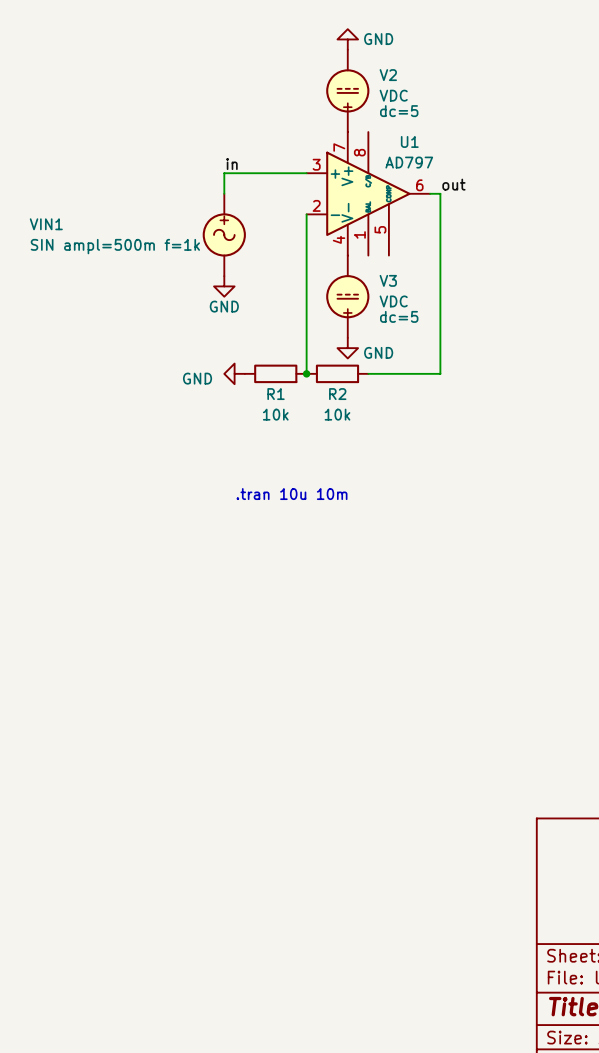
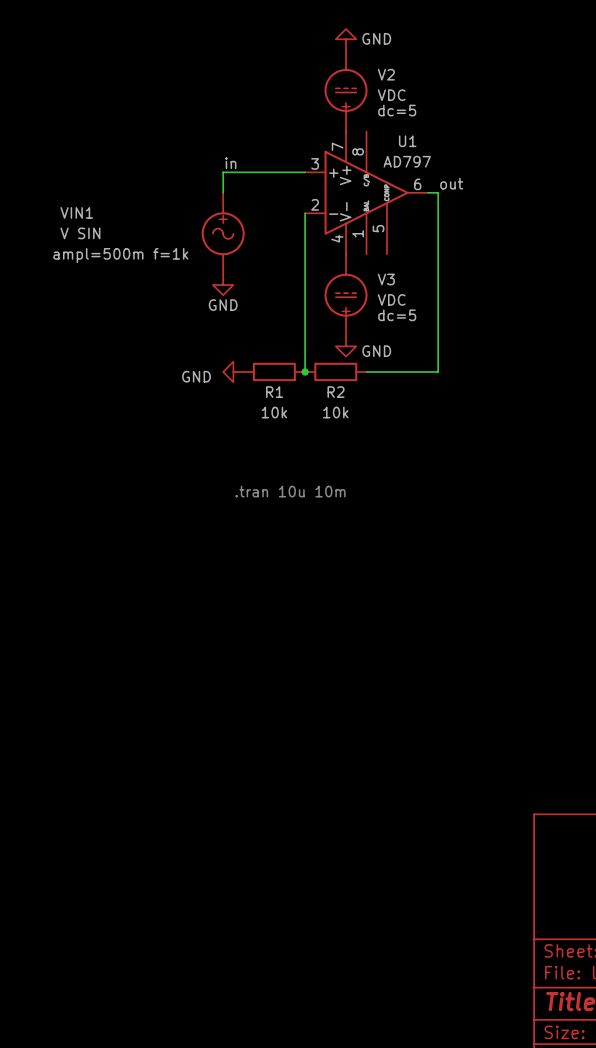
VIN1 name position: VIN1 (46, 224) -> VIN1 (76, 212)
VIN1 value: SIN ampl=500m f=1k (115, 246) -> V SIN (80, 233)
VIN1 text: none -> ampl=500m f=1k (120, 255)

